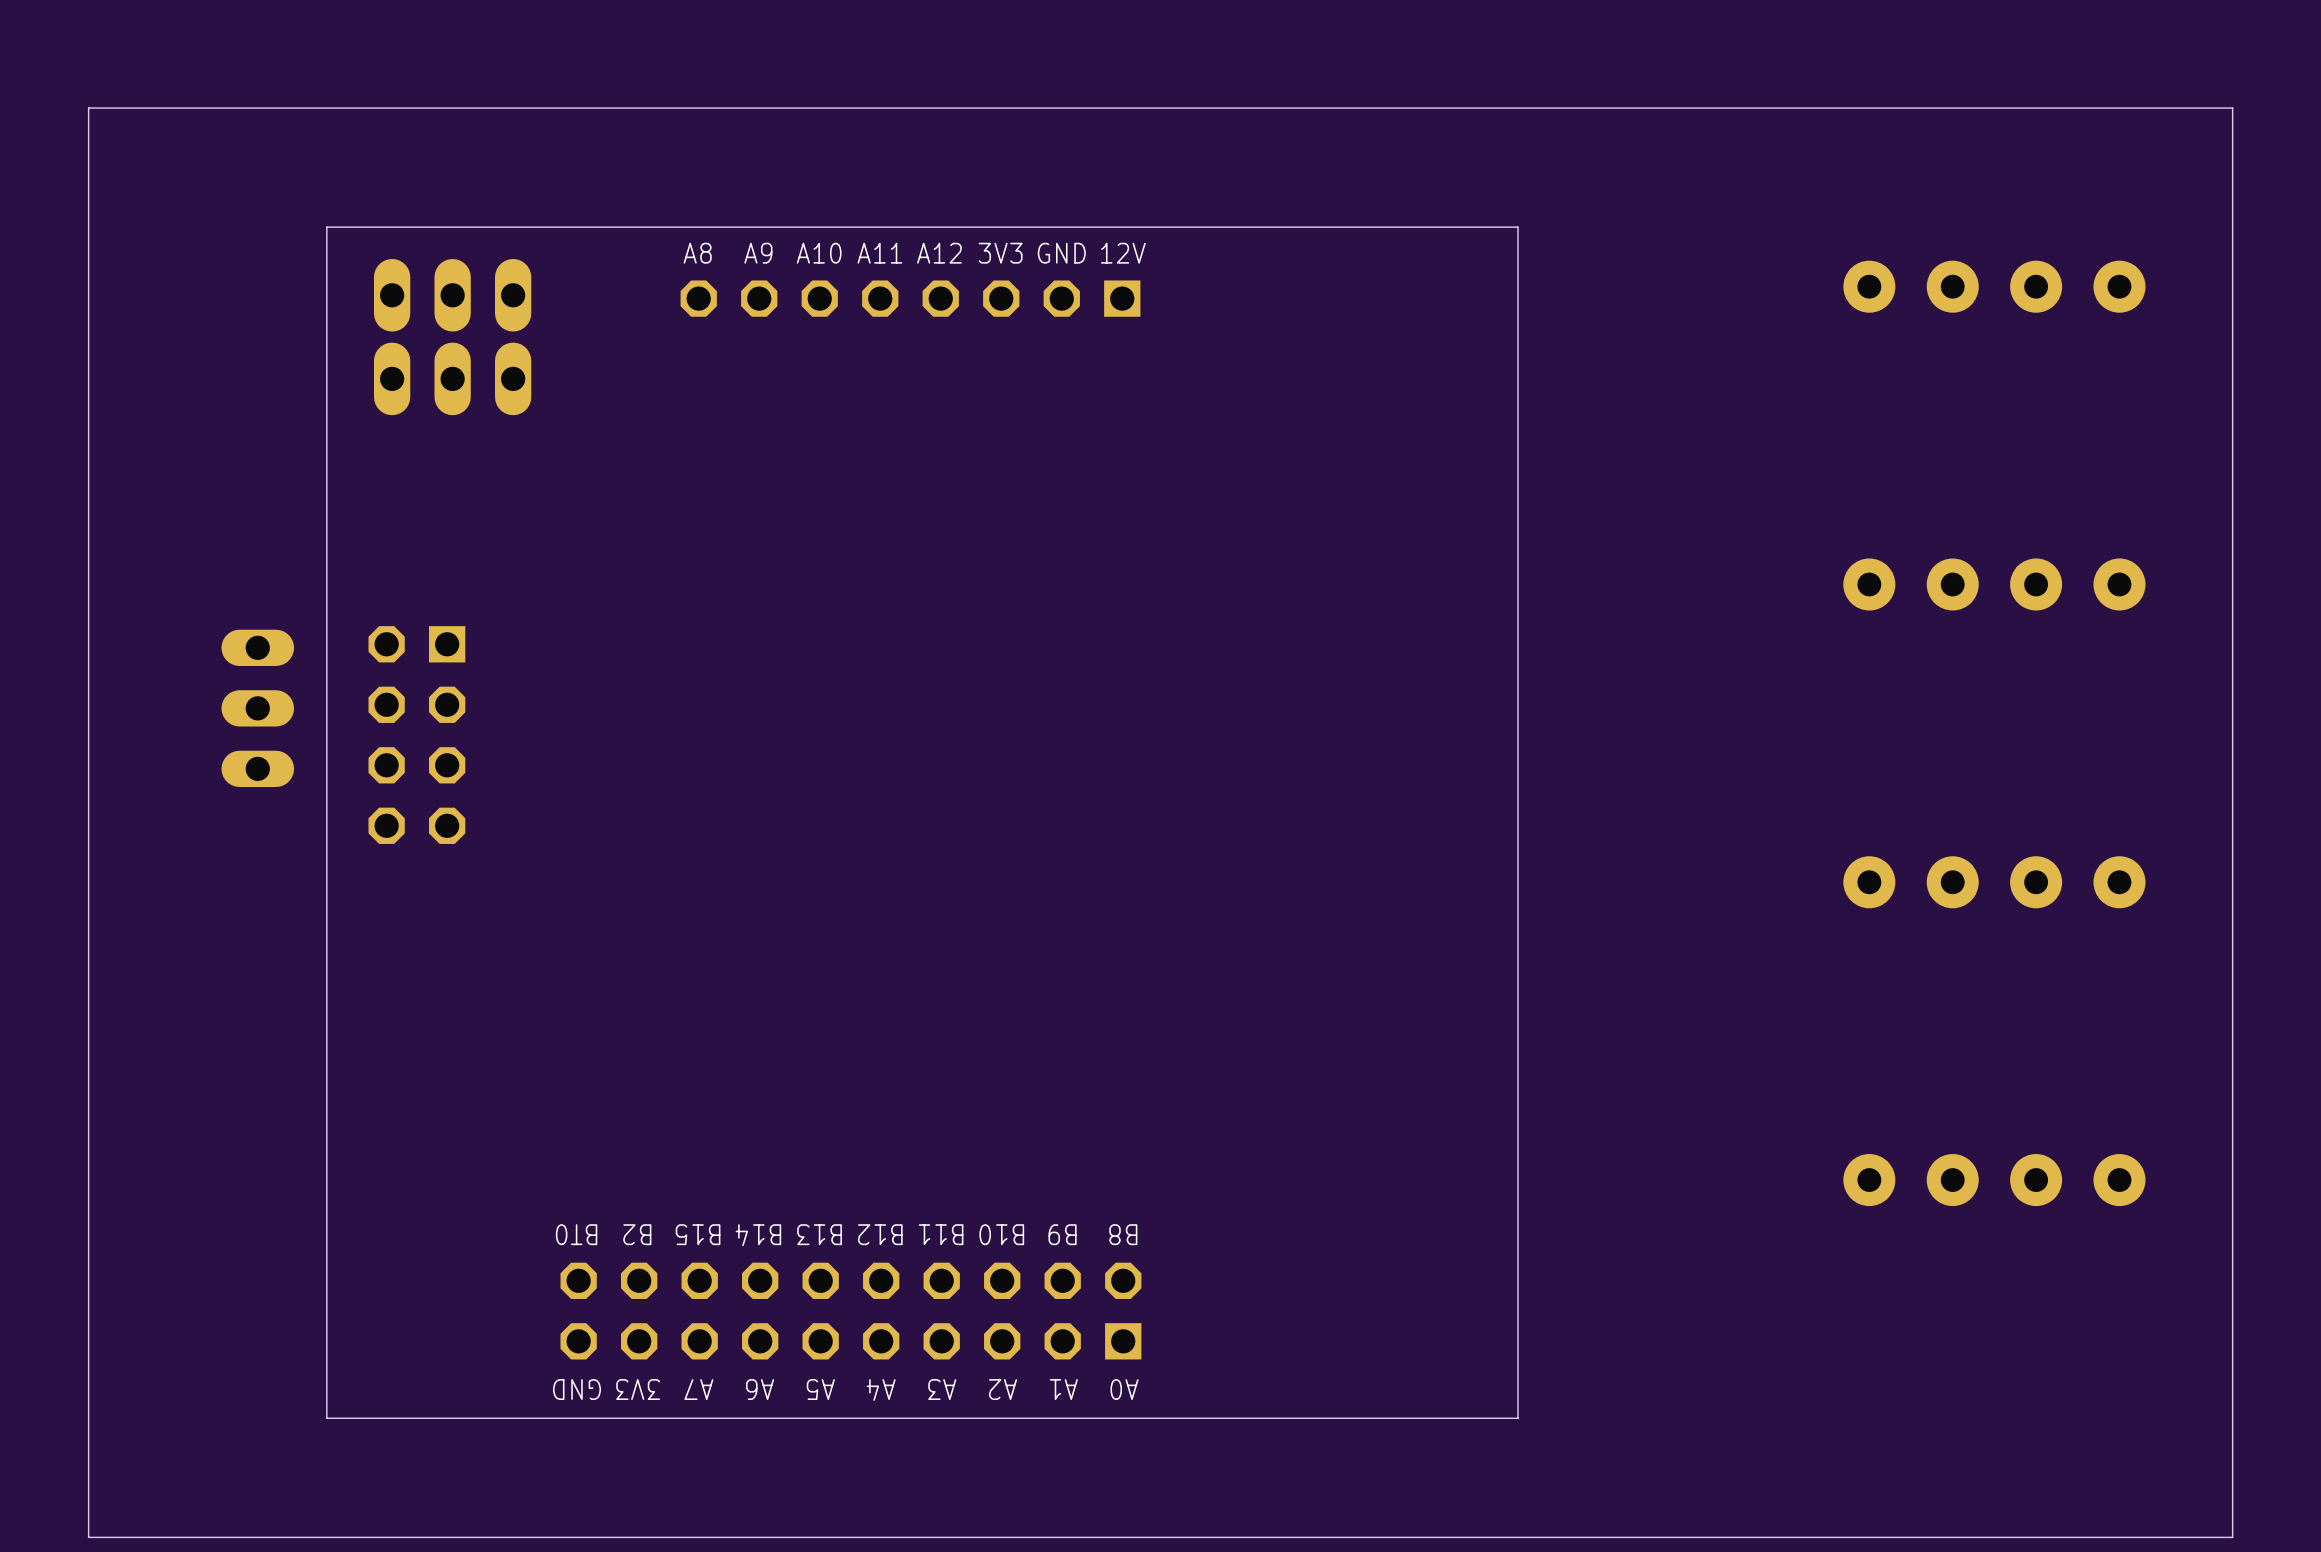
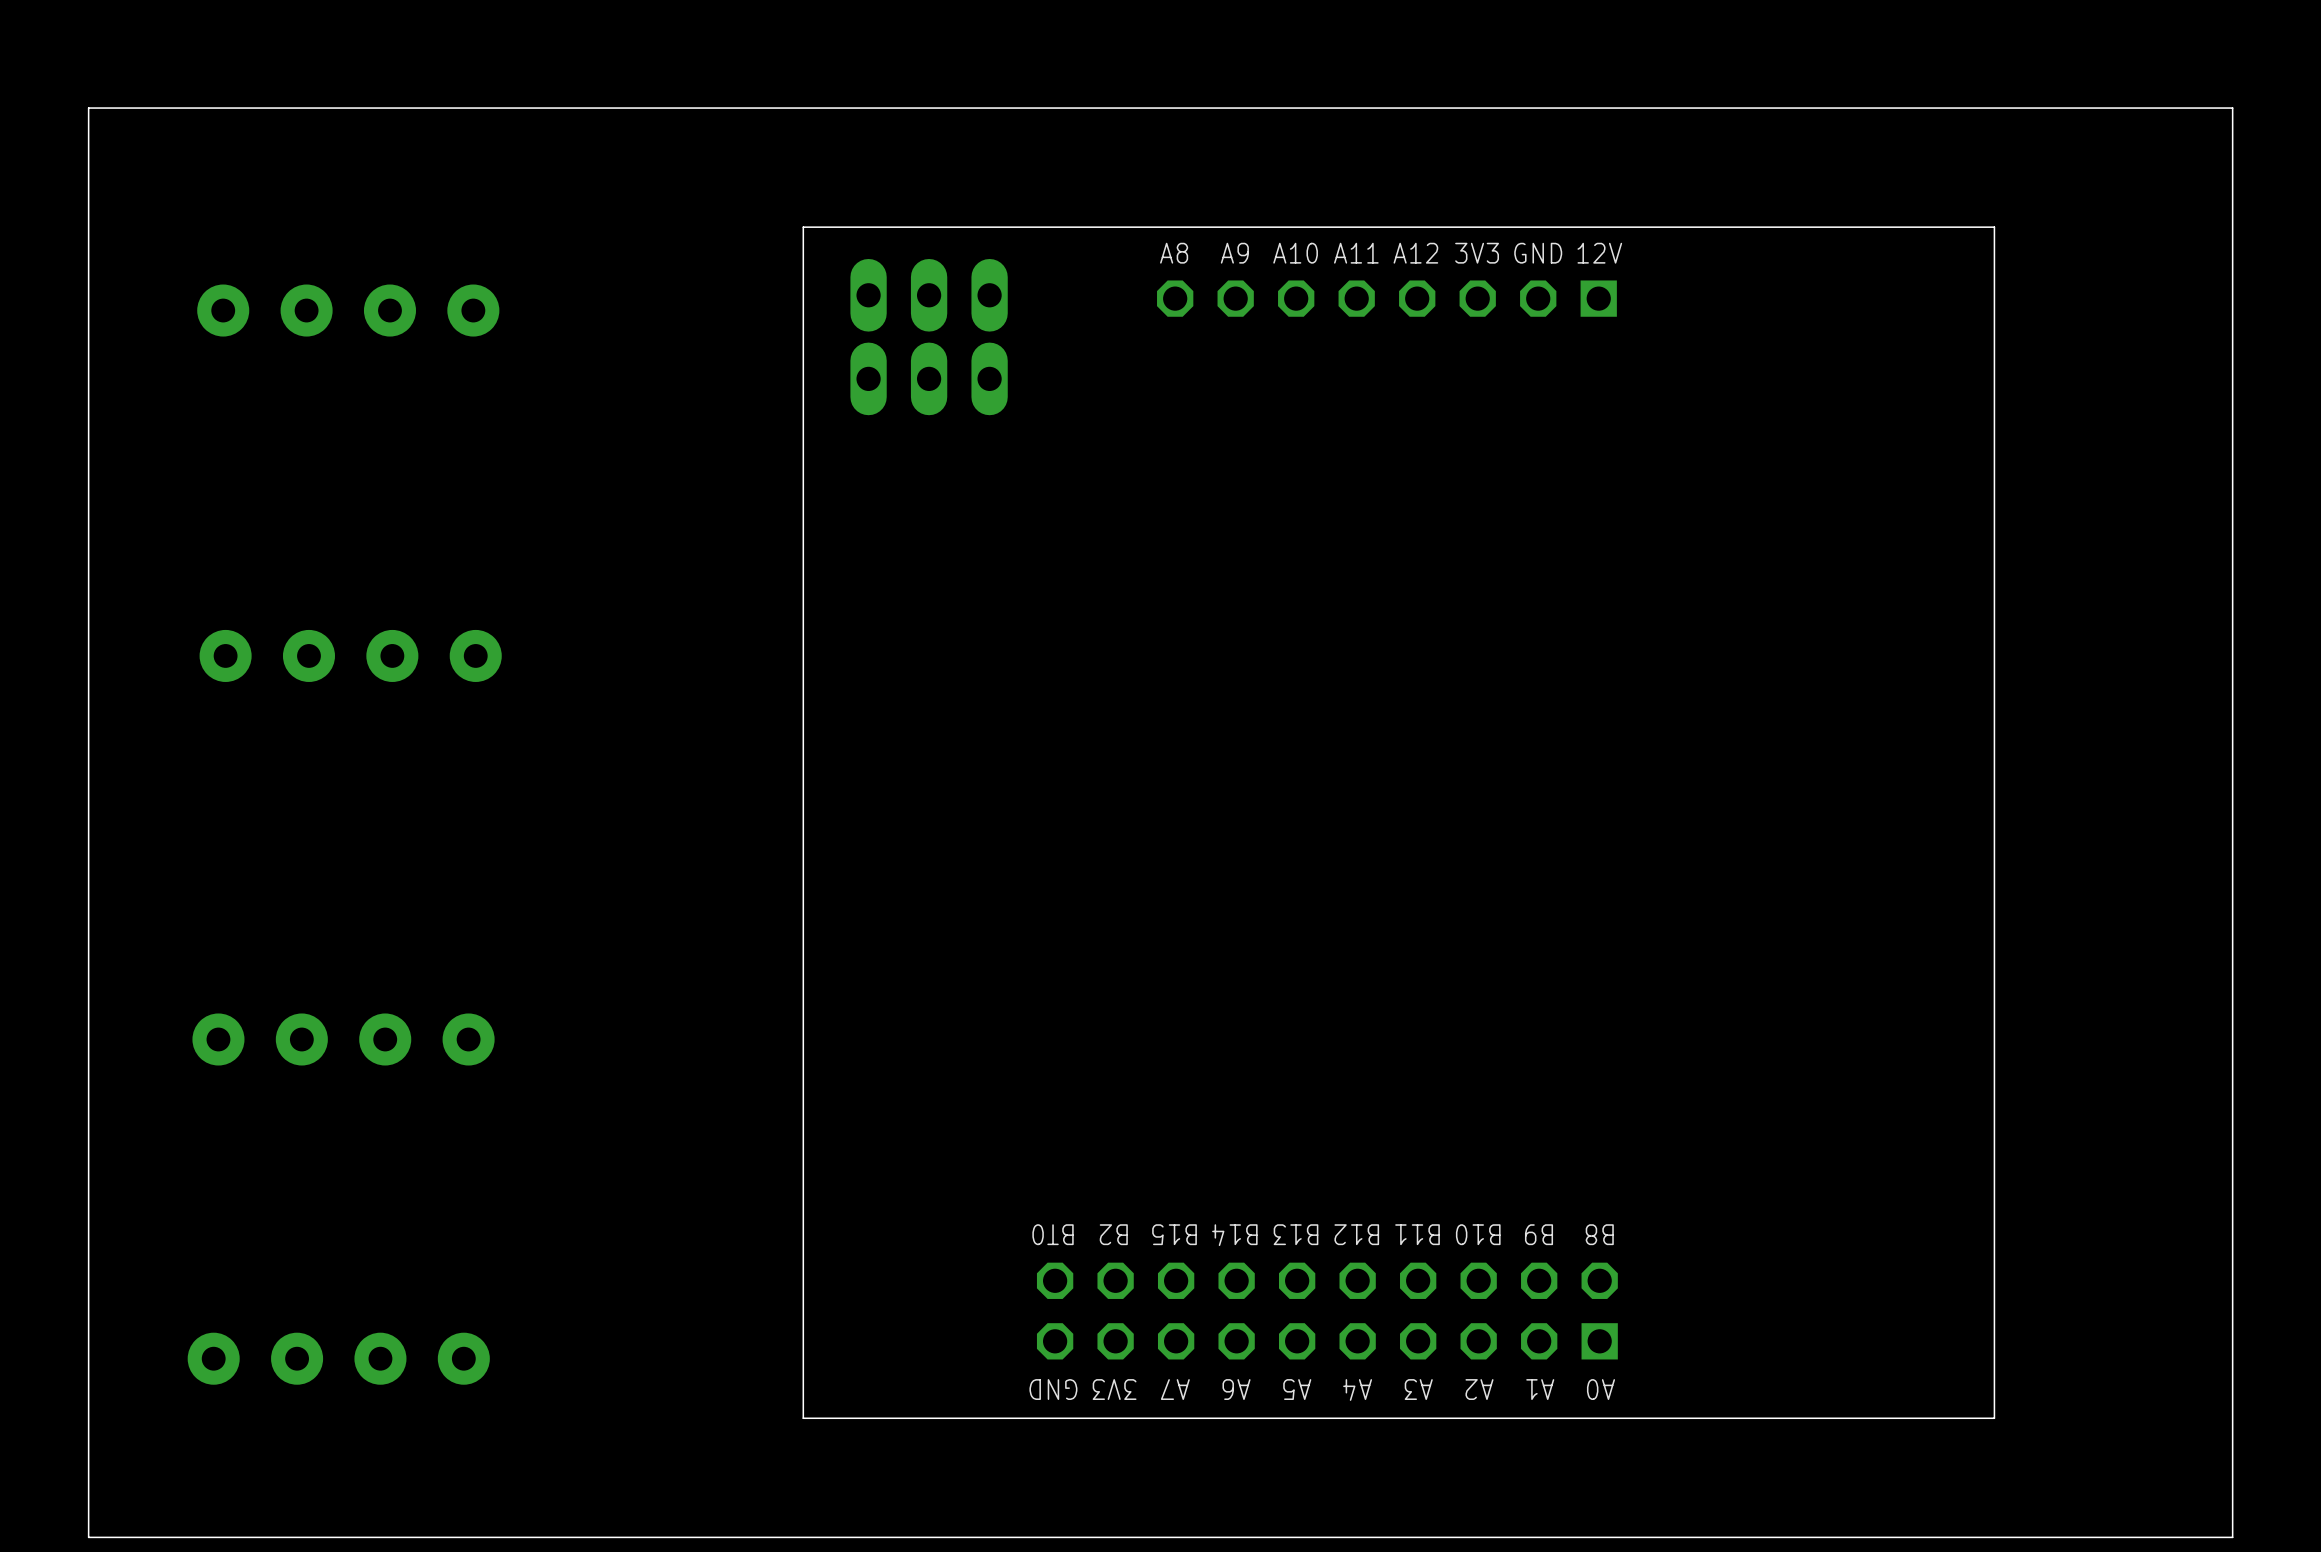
part: (1994, 286) -> none
part: (452, 295) -> none
part: none -> (929, 295)
part: none -> (348, 310)
part: (452, 378) -> none
part: none -> (929, 378)
part: (1994, 584) -> none
part: none -> (350, 655)
part: (257, 708) -> none
part: (416, 735) -> none
part position: (922, 822) -> (1398, 822)
part: (1994, 882) -> none
part: none -> (343, 1039)
part: (1994, 1180) -> none
part: none -> (338, 1358)

